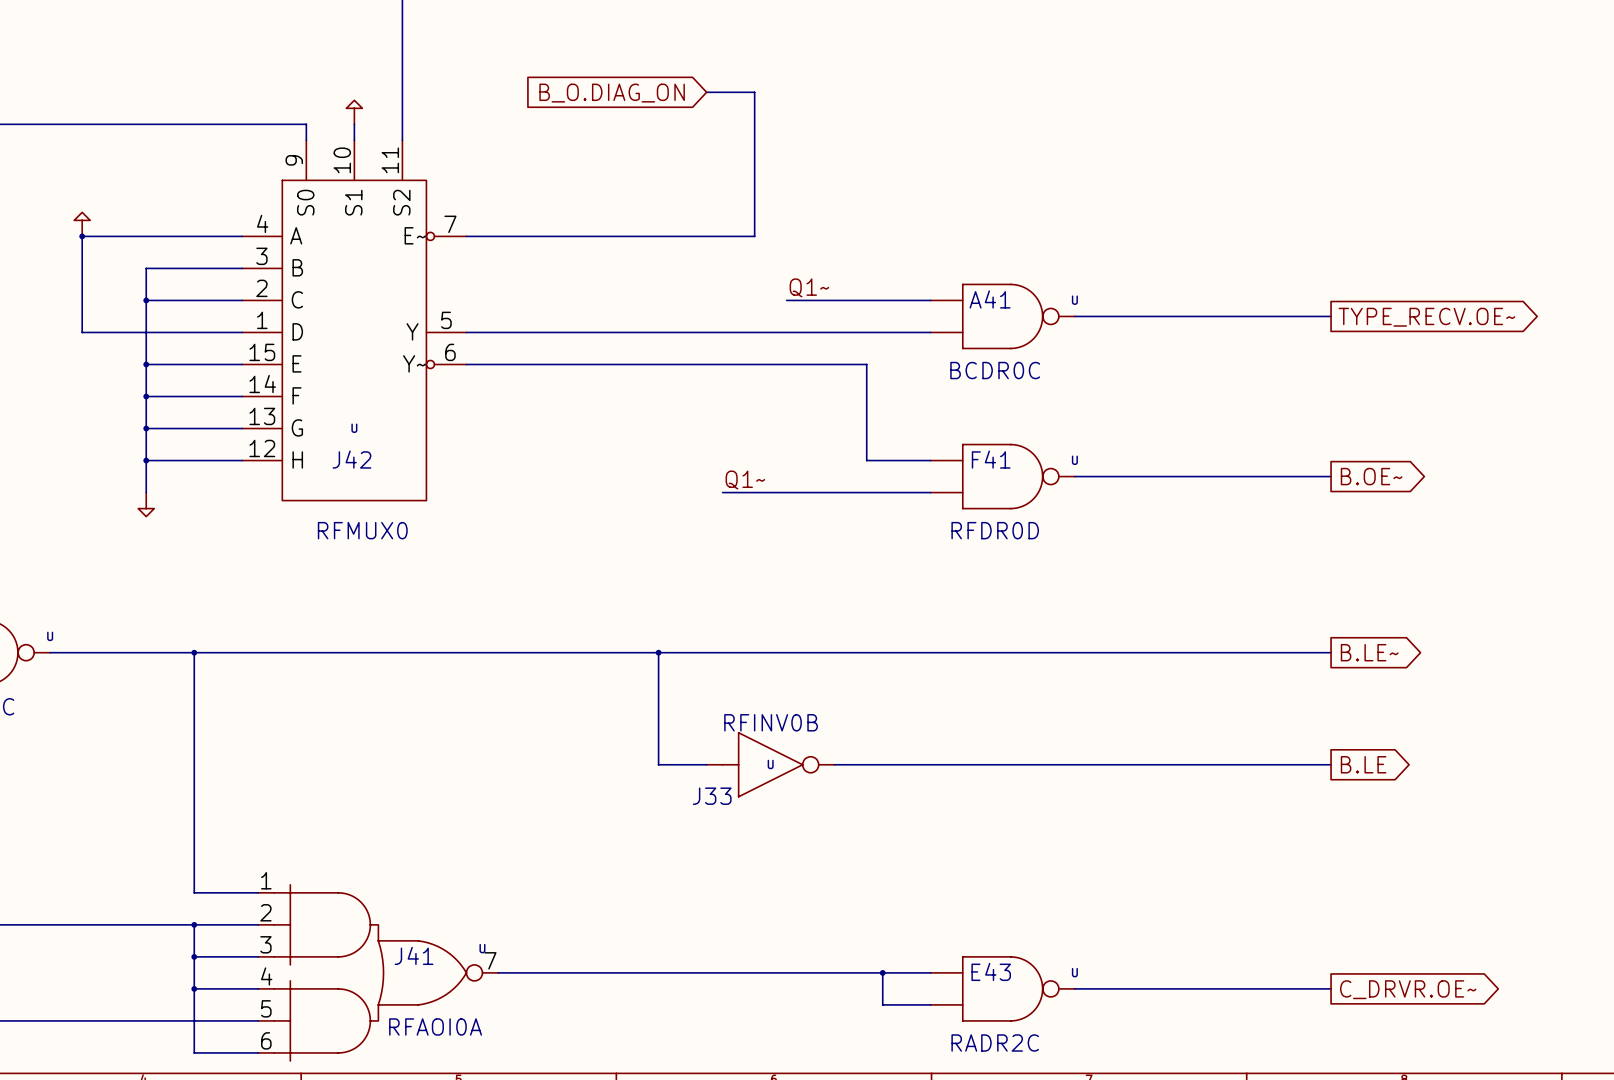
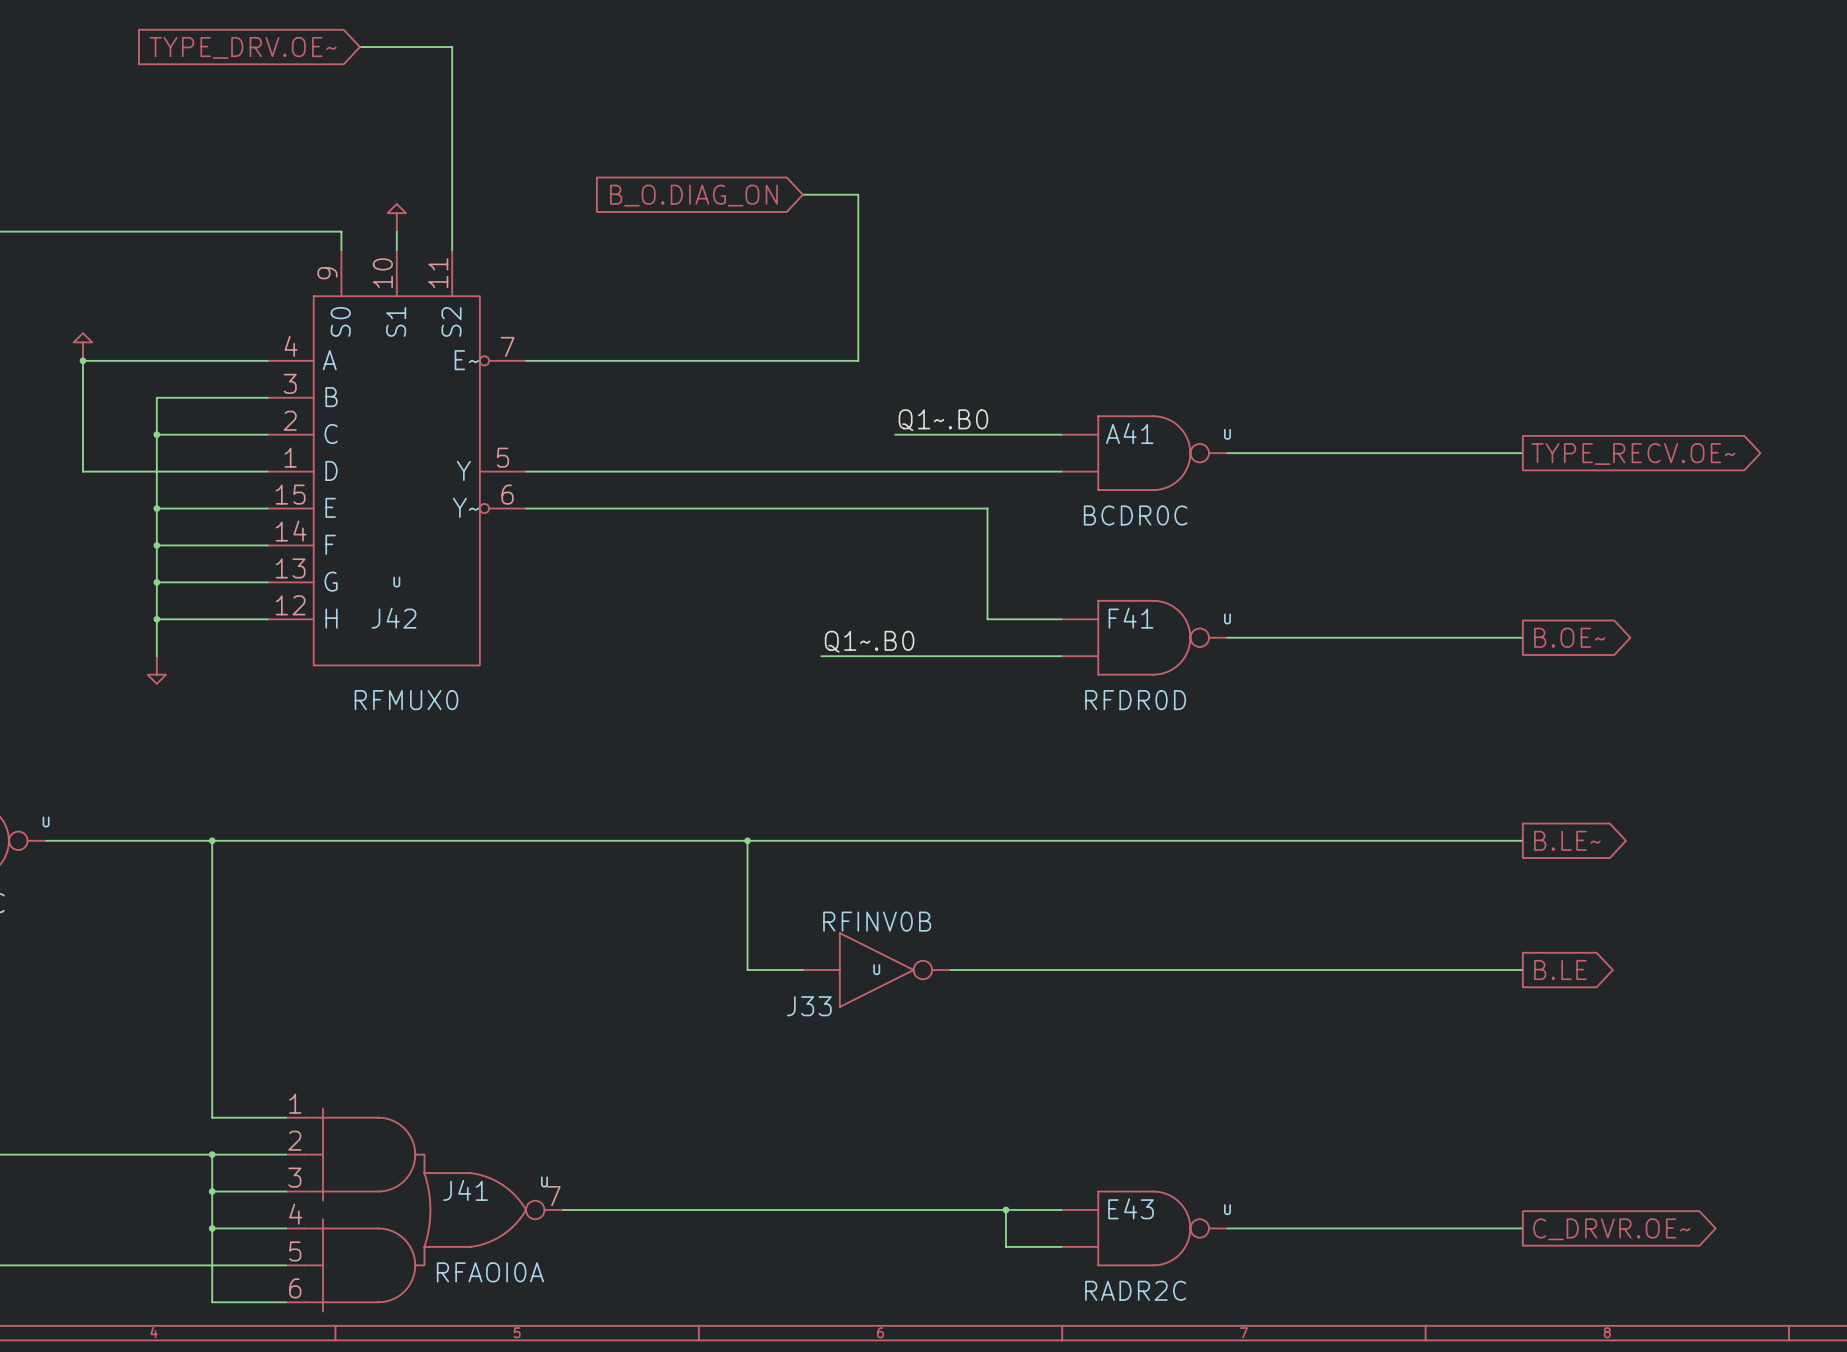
label: Q1~ (809, 287) -> Q1~.B0 (943, 420)
label: Q1~ (745, 480) -> Q1~.B0 (869, 641)

